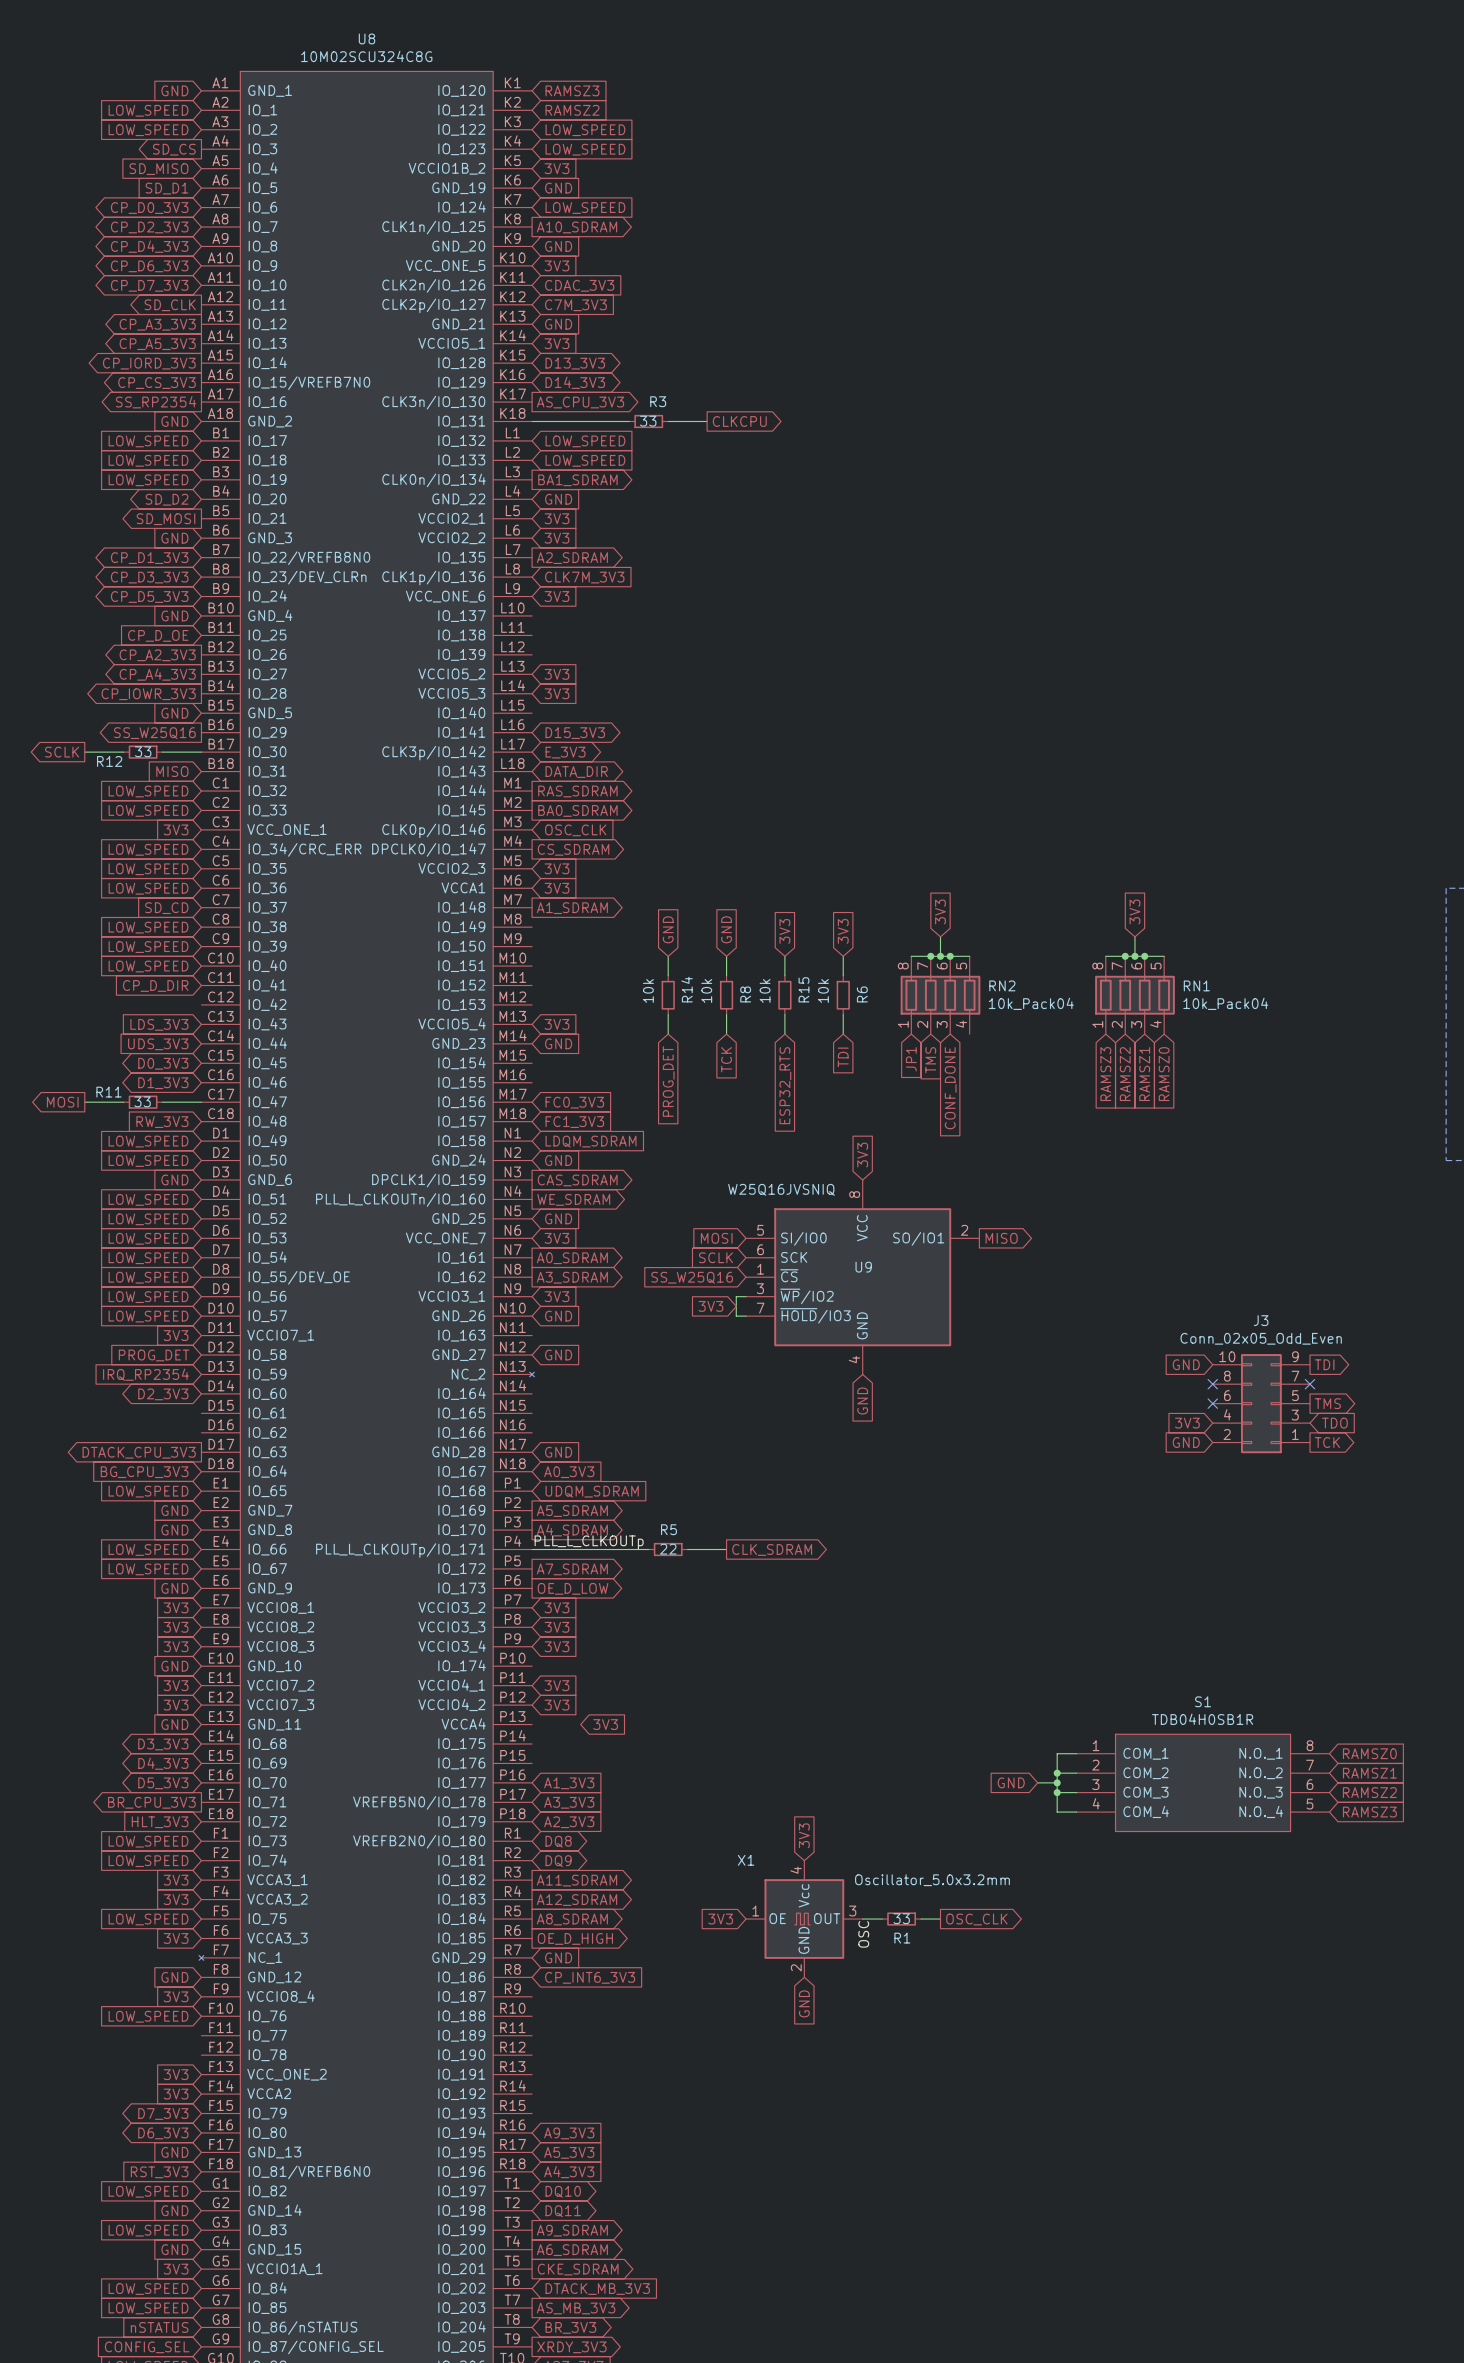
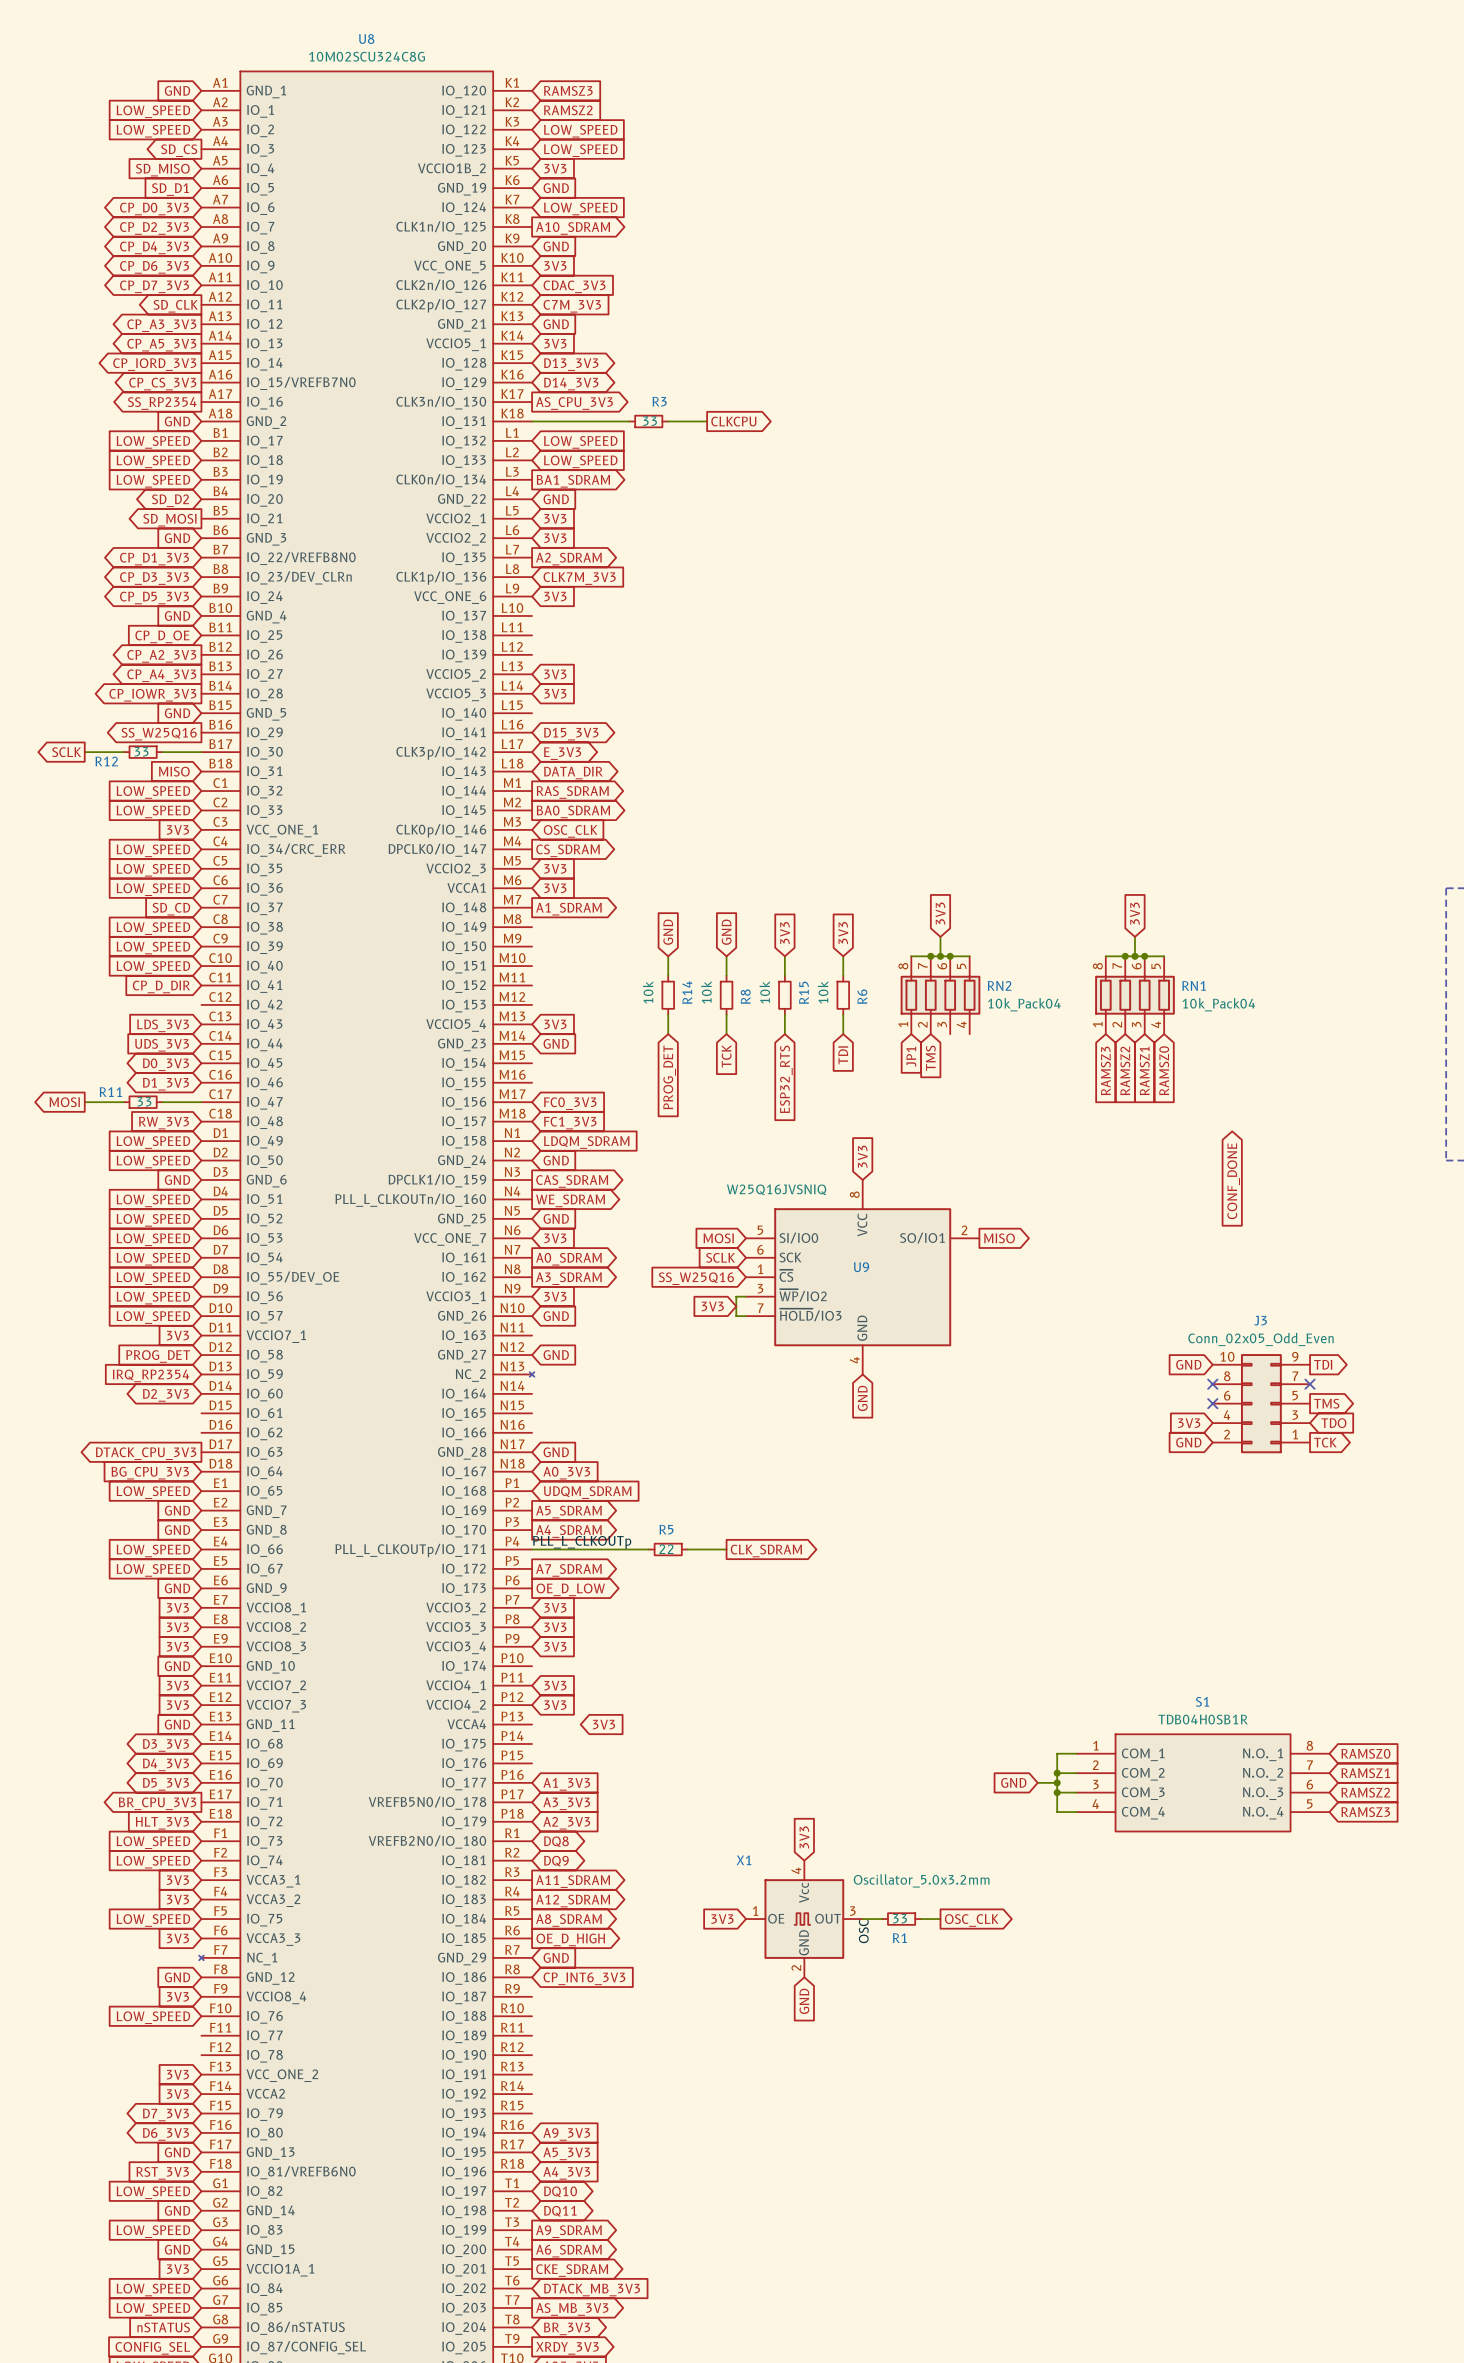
global label: CONF_DONE (950, 1088) -> none
global label: none -> CONF_DONE (1233, 1181)

